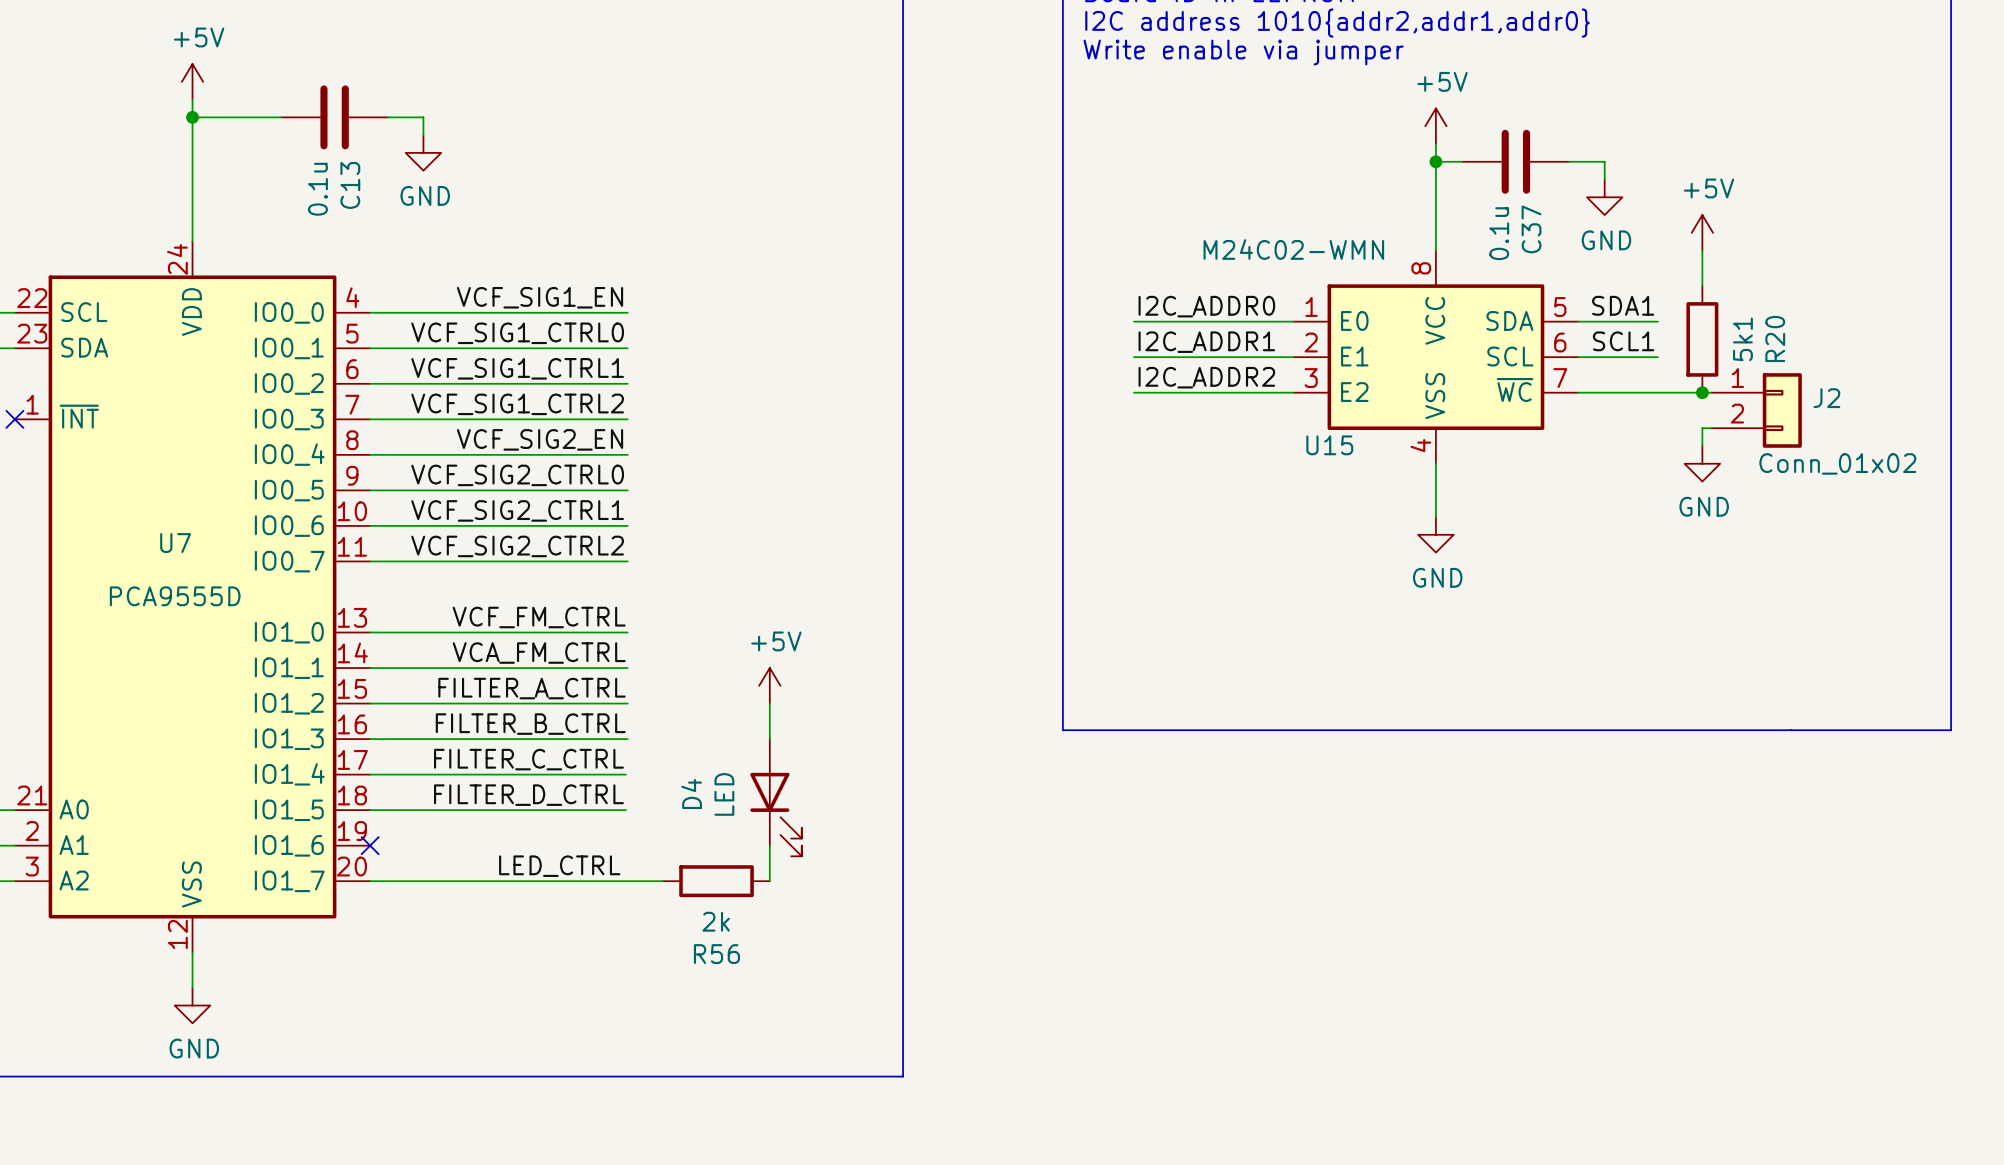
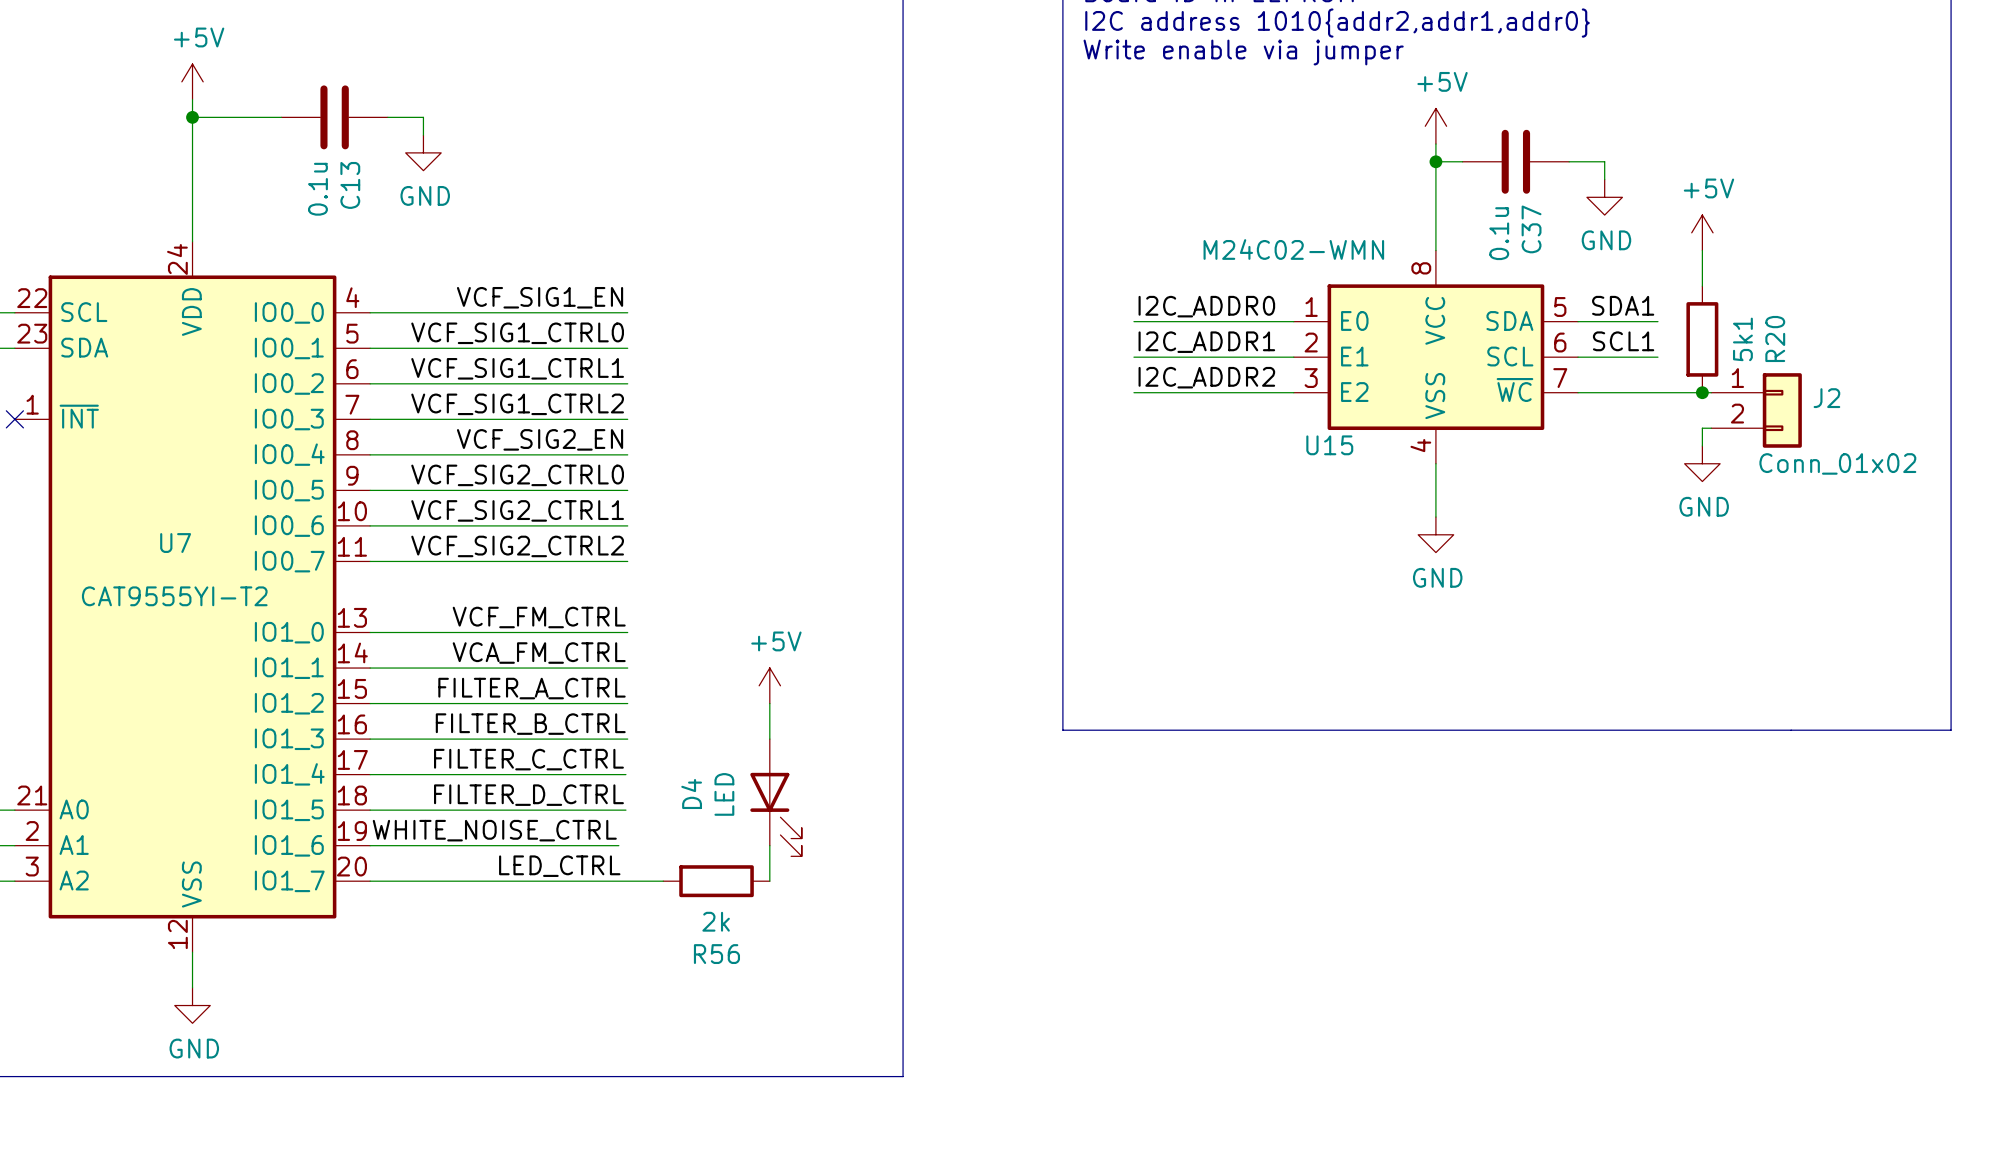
U7 value: PCA9555D (175, 596) -> CAT9555YI-T2 (174, 596)
label: none -> WHITE_NOISE_CTRL (494, 830)
wire: none -> (370, 845) (618, 845)
no-connect mark: (370, 845) -> none

